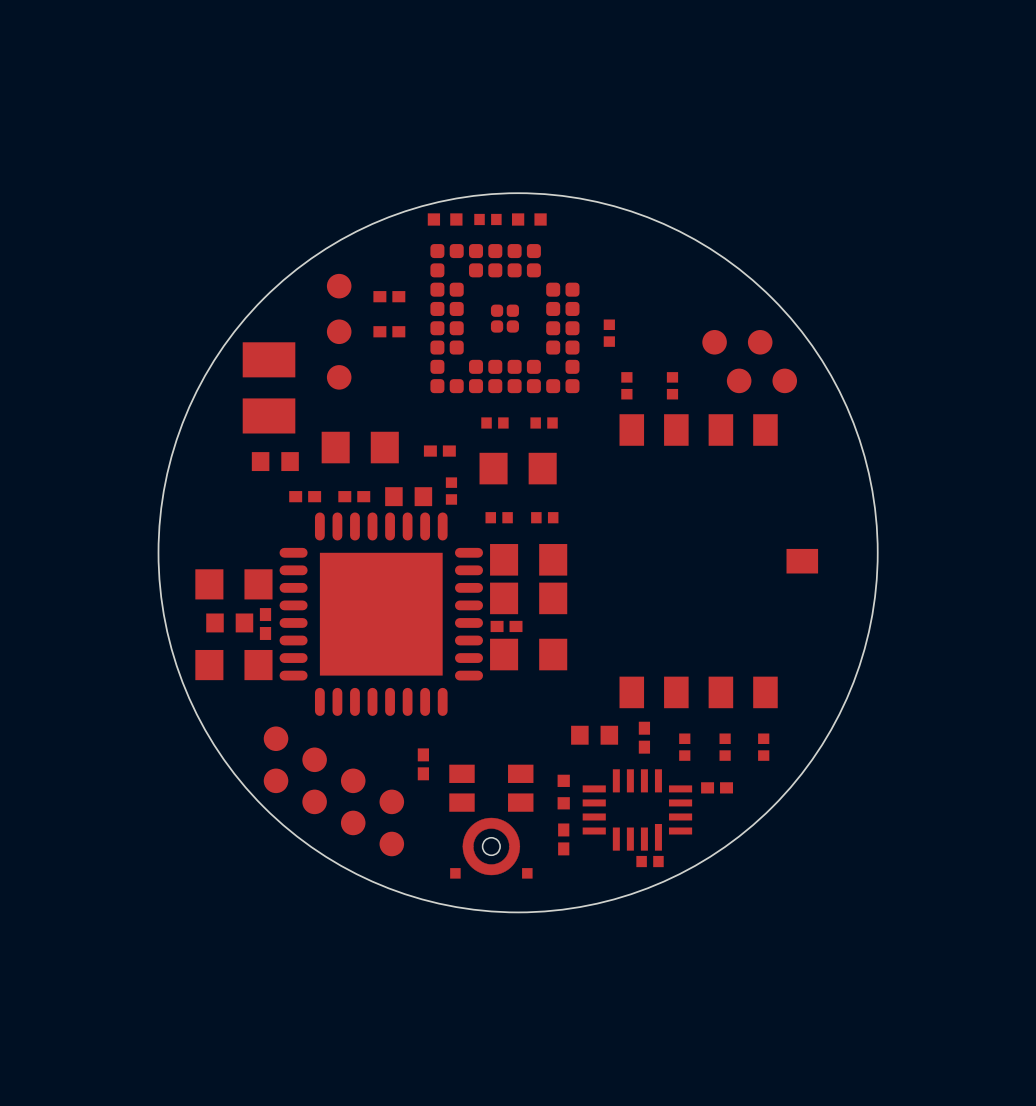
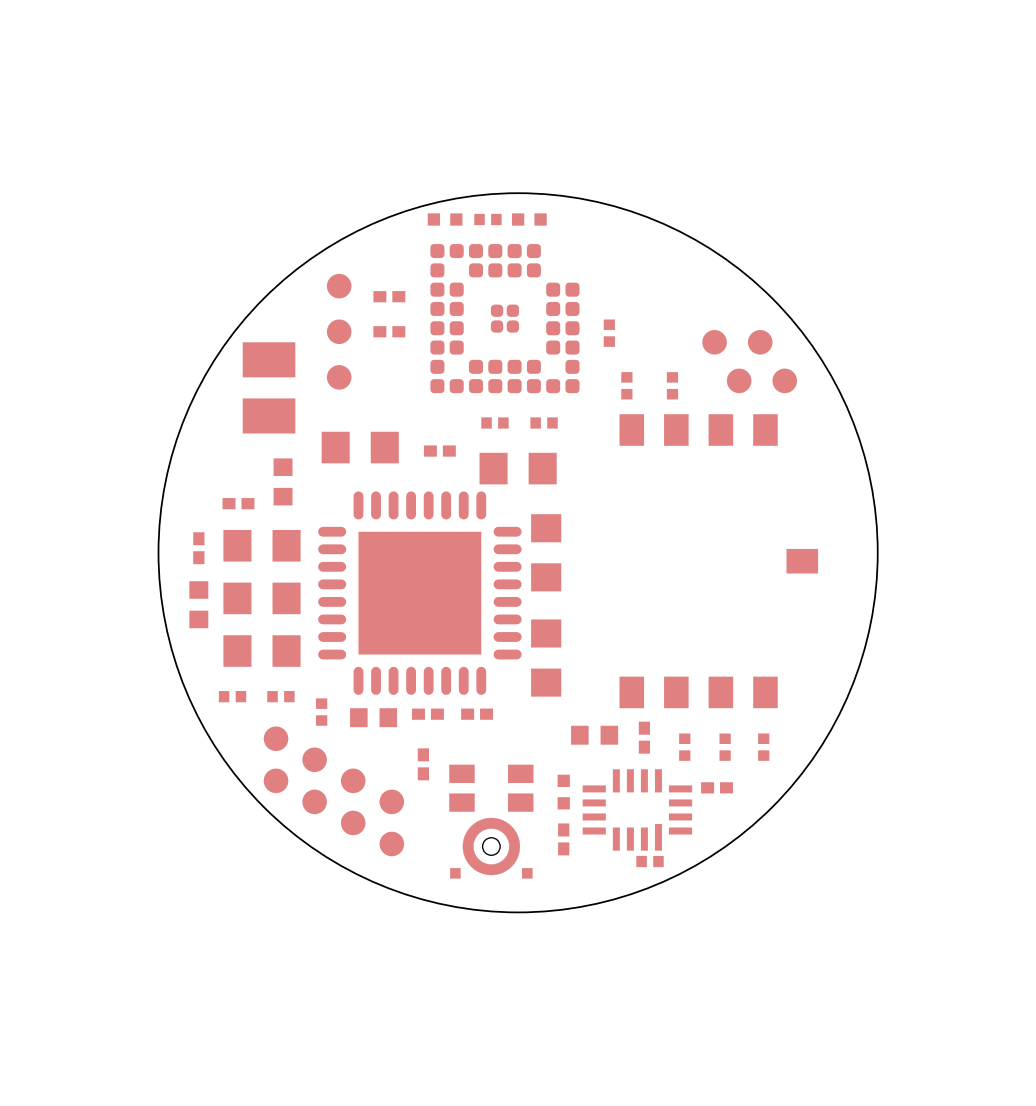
part rotation: 0° (275, 461) -> 90° clockwise (283, 481)
part: (451, 491) -> none
part: (305, 496) -> none
part: (354, 496) -> none
part: (408, 496) -> none
part: none -> (238, 503)
part: (499, 517) -> none
part: (544, 517) -> none
part: none -> (262, 545)
part: none -> (198, 548)
part: none -> (546, 552)
part: (528, 559) -> none
part: (233, 584) -> none
part: none -> (262, 598)
part: (528, 598) -> none
part position: (381, 614) -> (419, 593)
part rotation: 0° (229, 622) -> 90° clockwise (198, 604)
part position: (229, 622) -> (198, 604)
part: (265, 624) -> none
part: (506, 626) -> none
part footprint: [490, 638, 568, 671] -> [531, 619, 562, 697]
part: none -> (262, 651)
part: (233, 665) -> none
part: none -> (232, 696)
part: none -> (280, 696)
part: none -> (321, 712)
part: none -> (427, 714)
part: none -> (477, 714)
part: none -> (373, 717)

